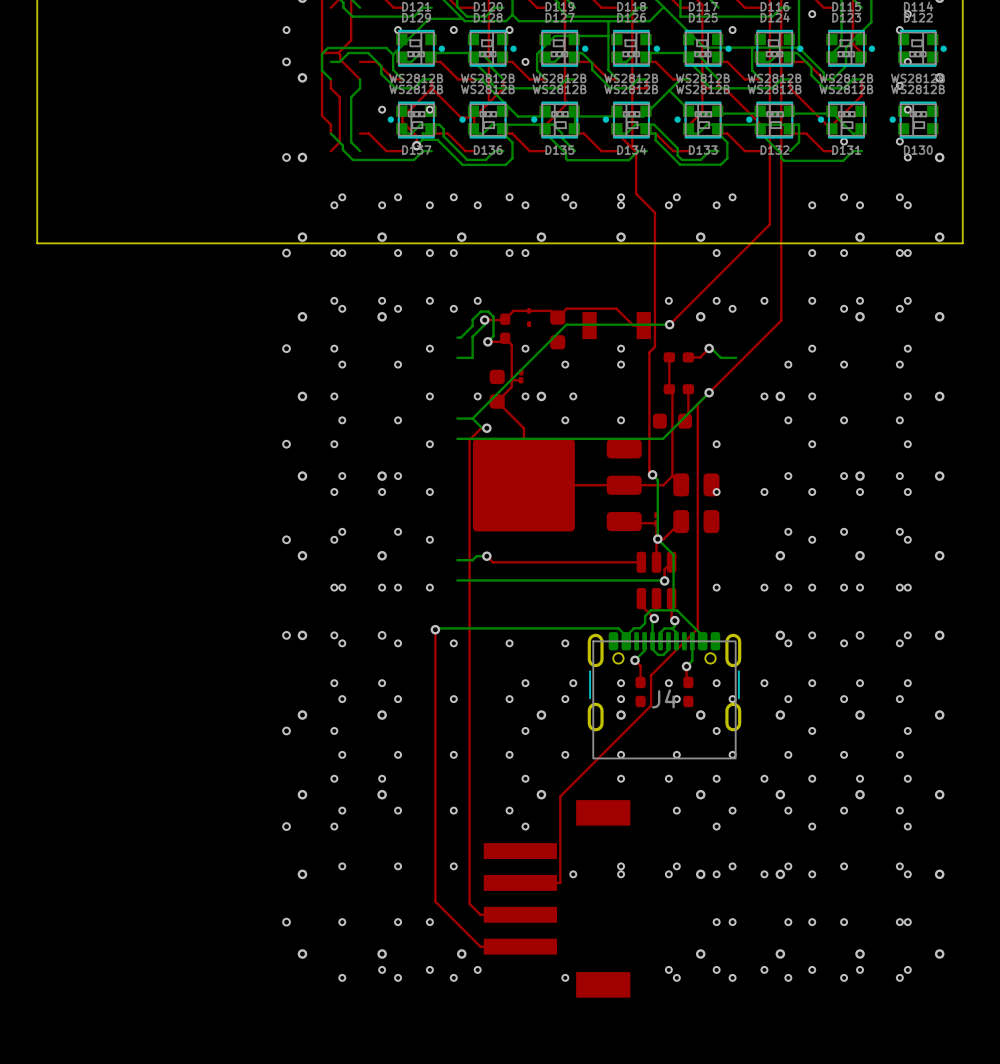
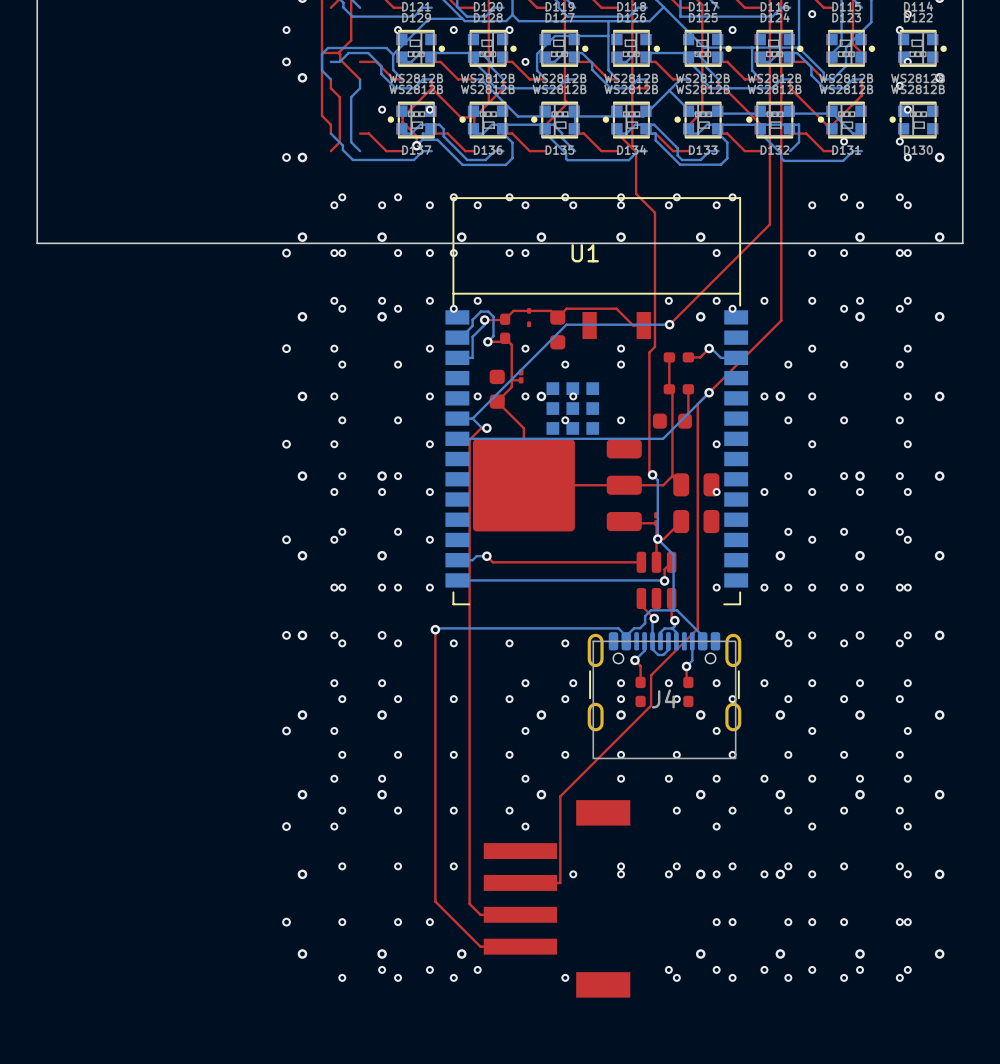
U1: none -> (596, 401)

